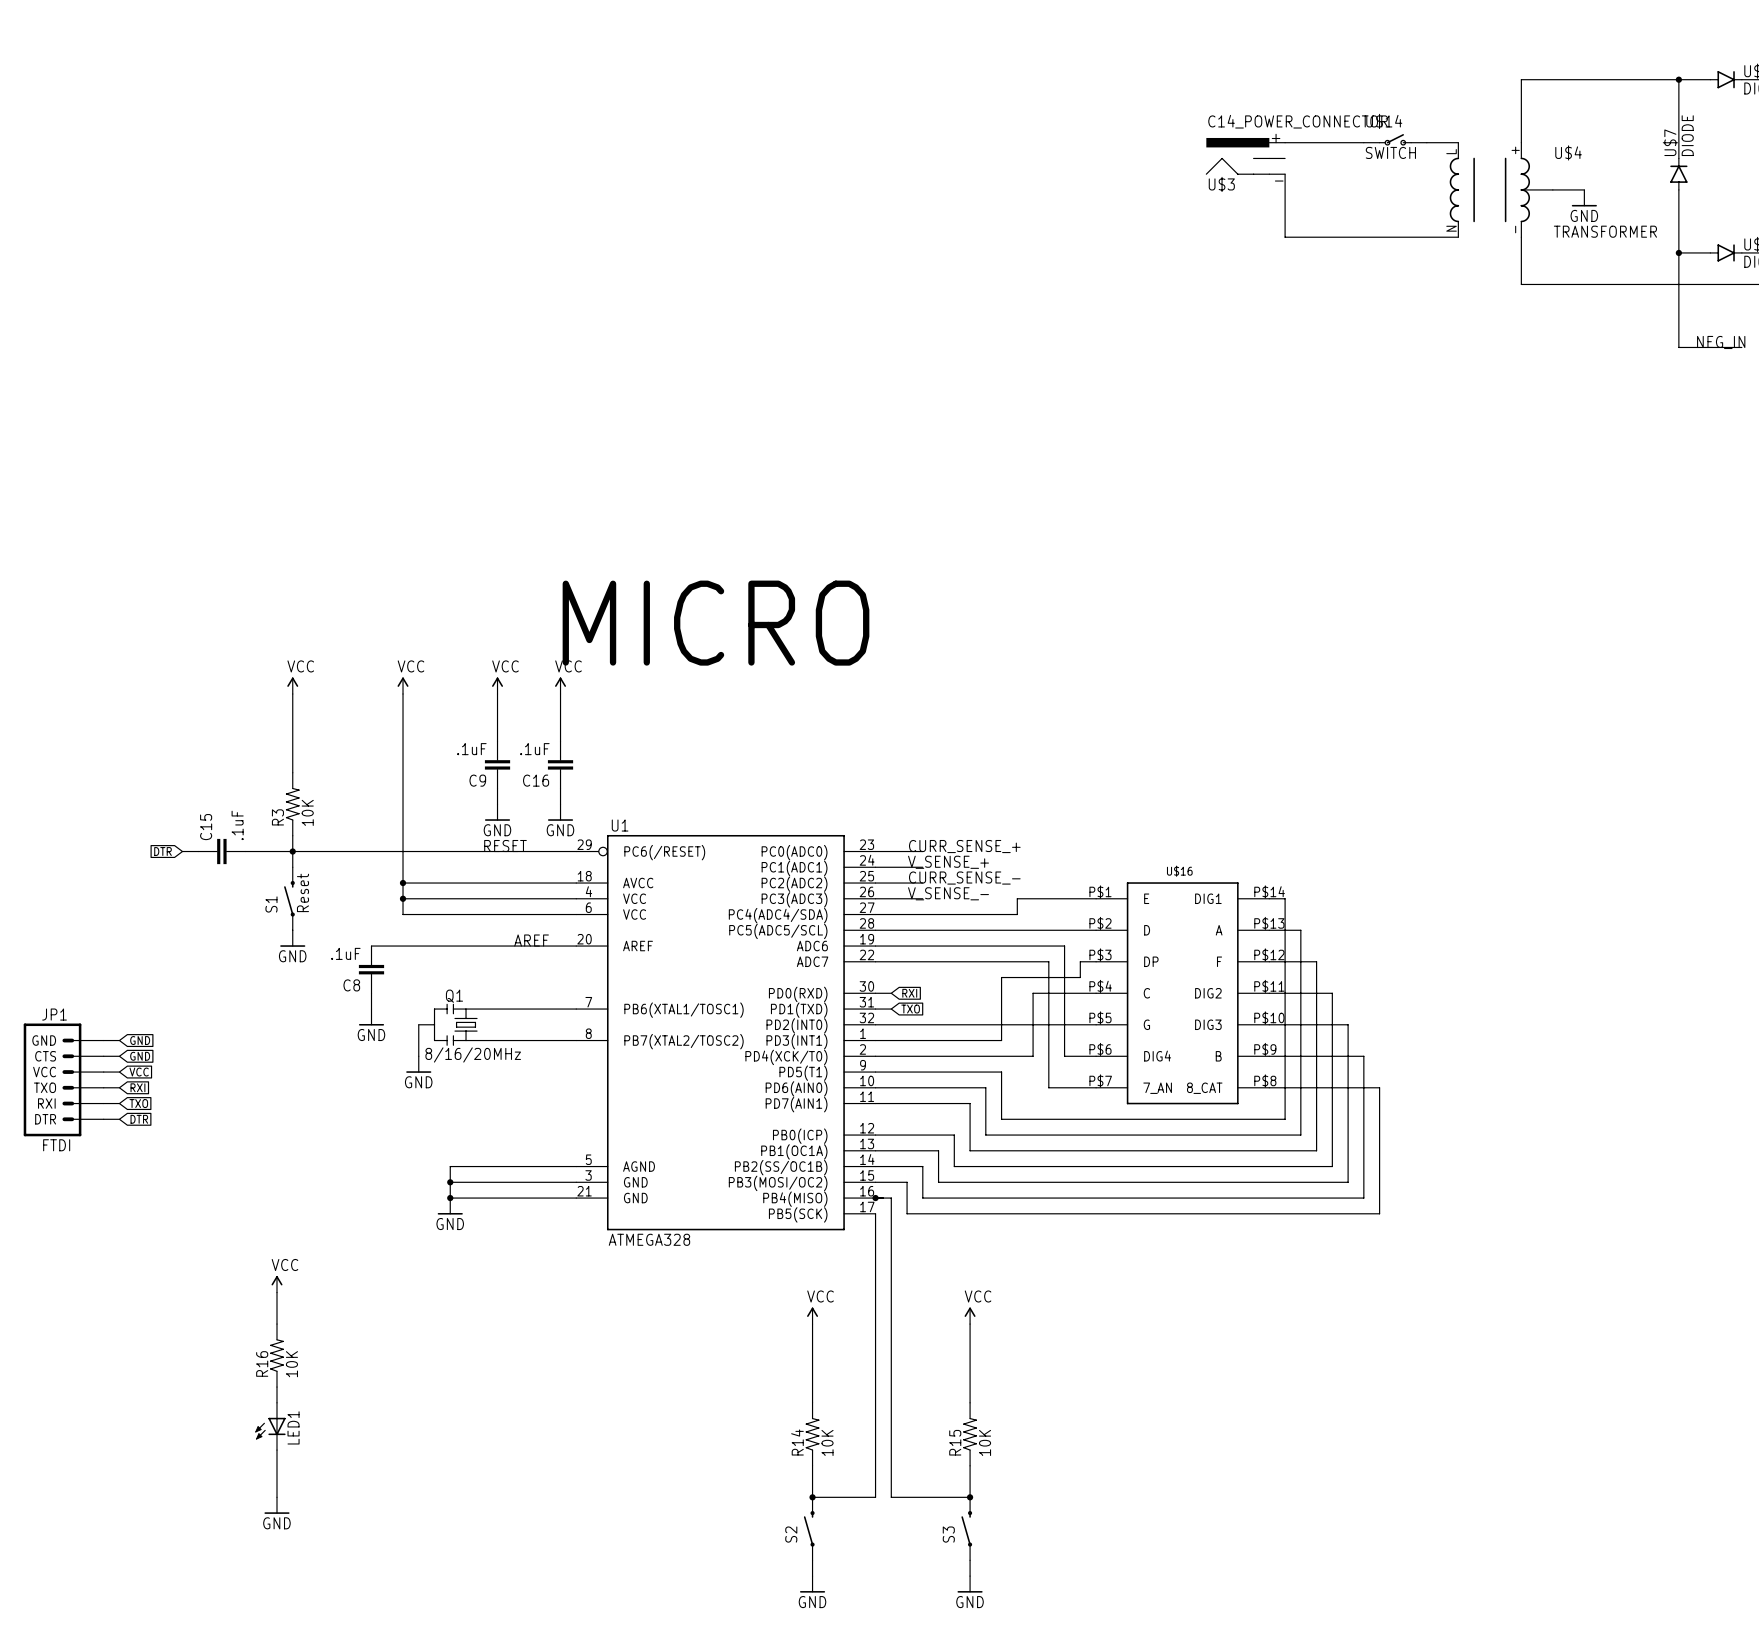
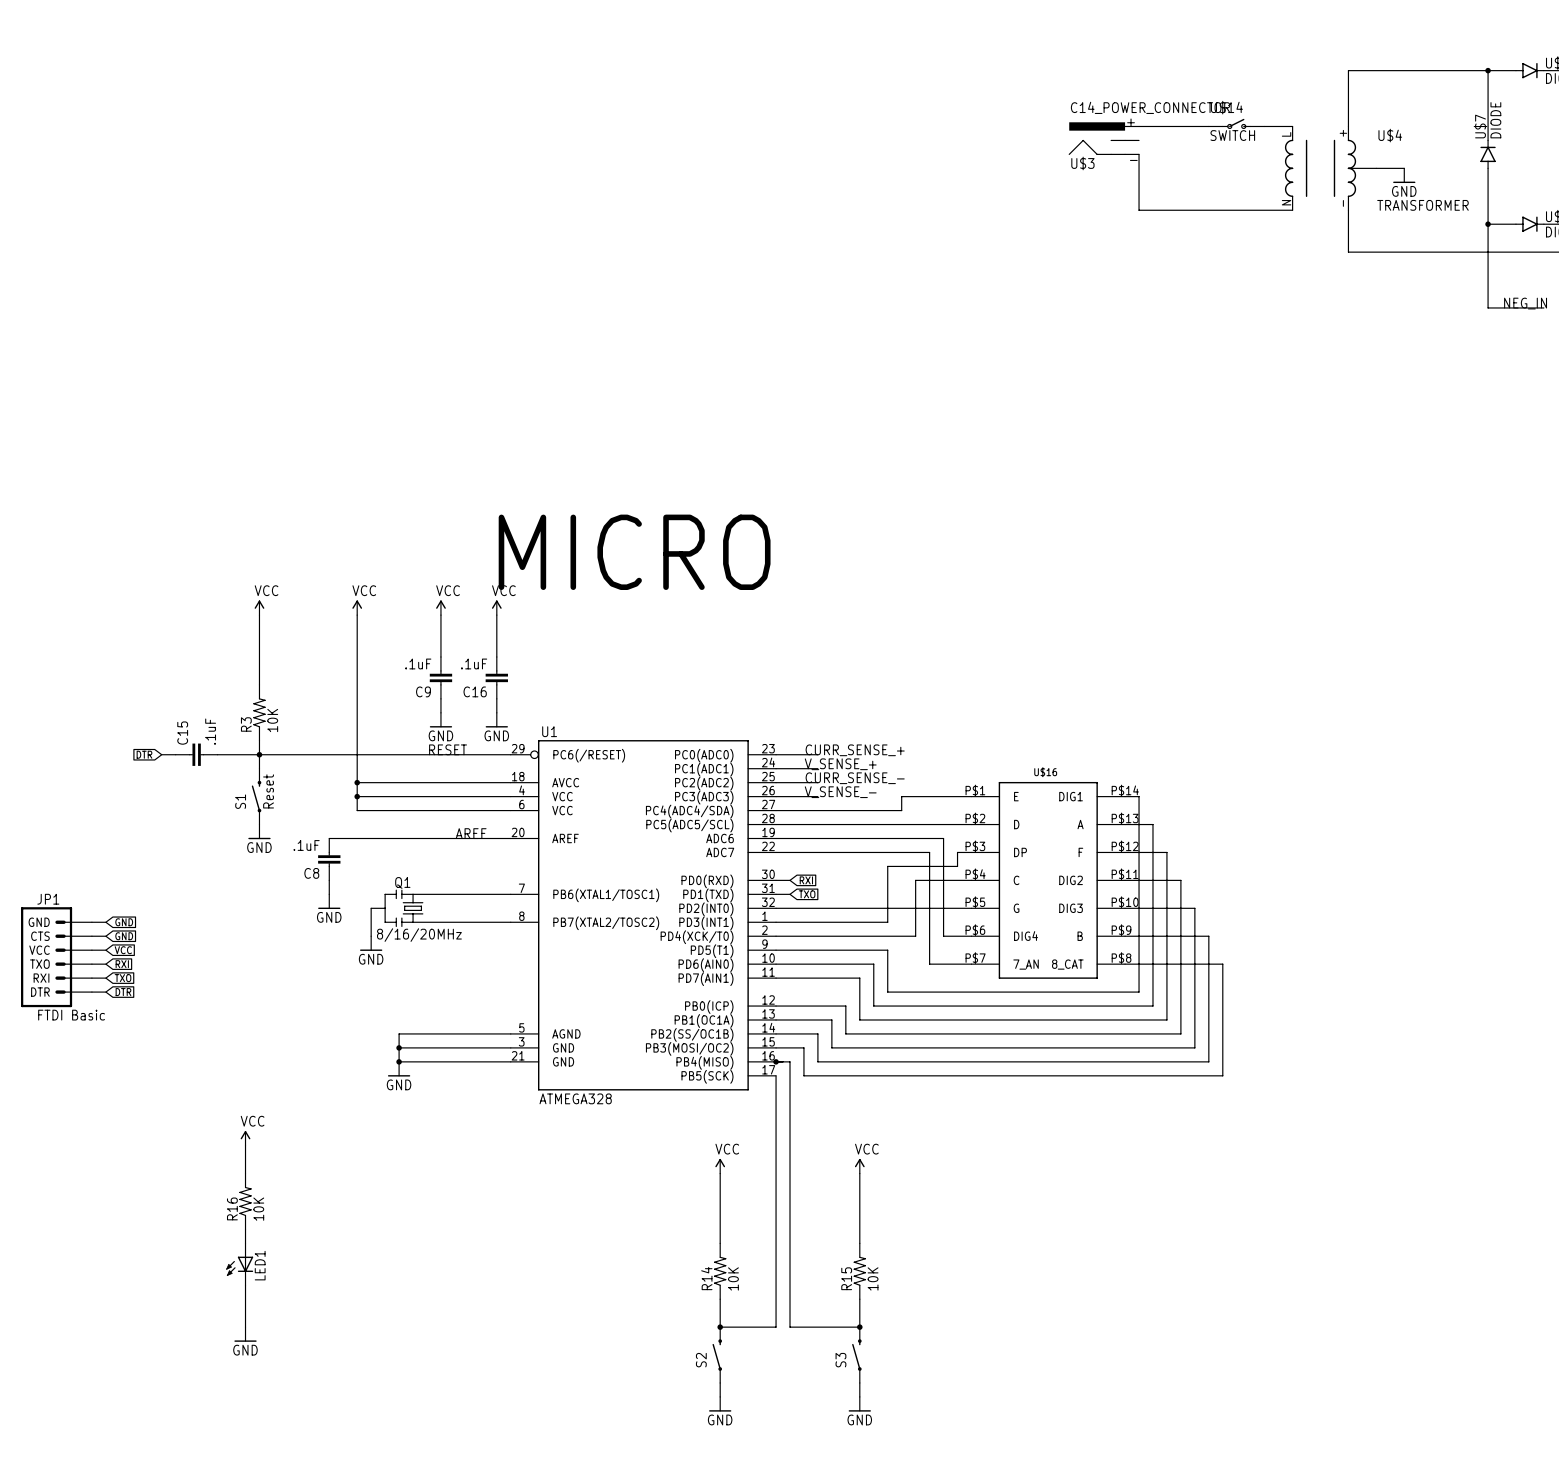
JP1 value: FTDI (56, 1145) -> FTDI Basic (71, 1015)

